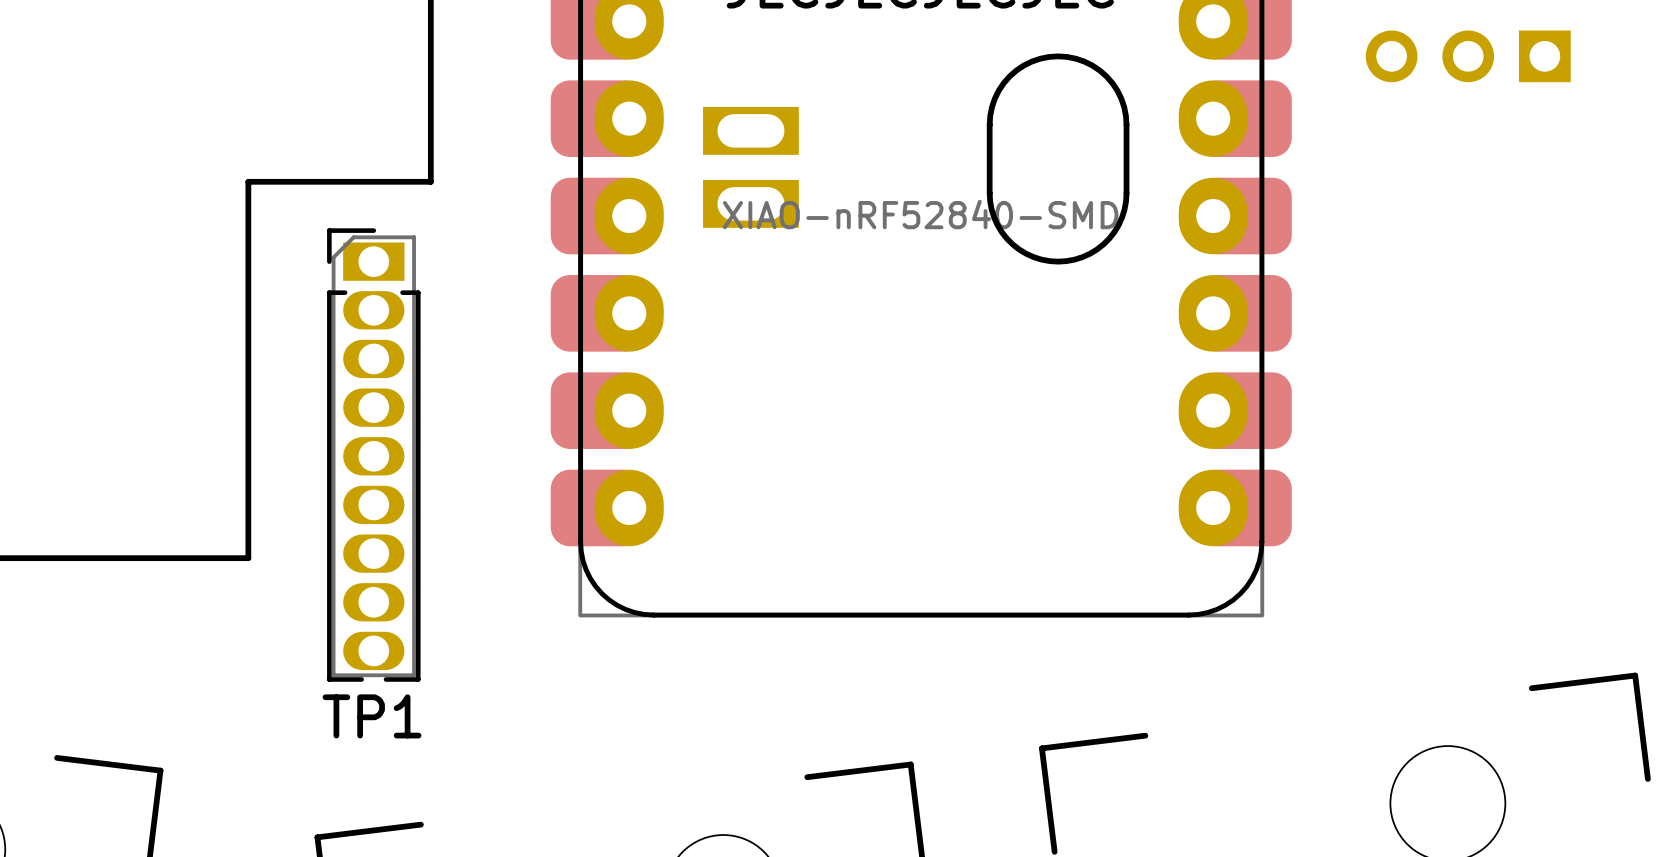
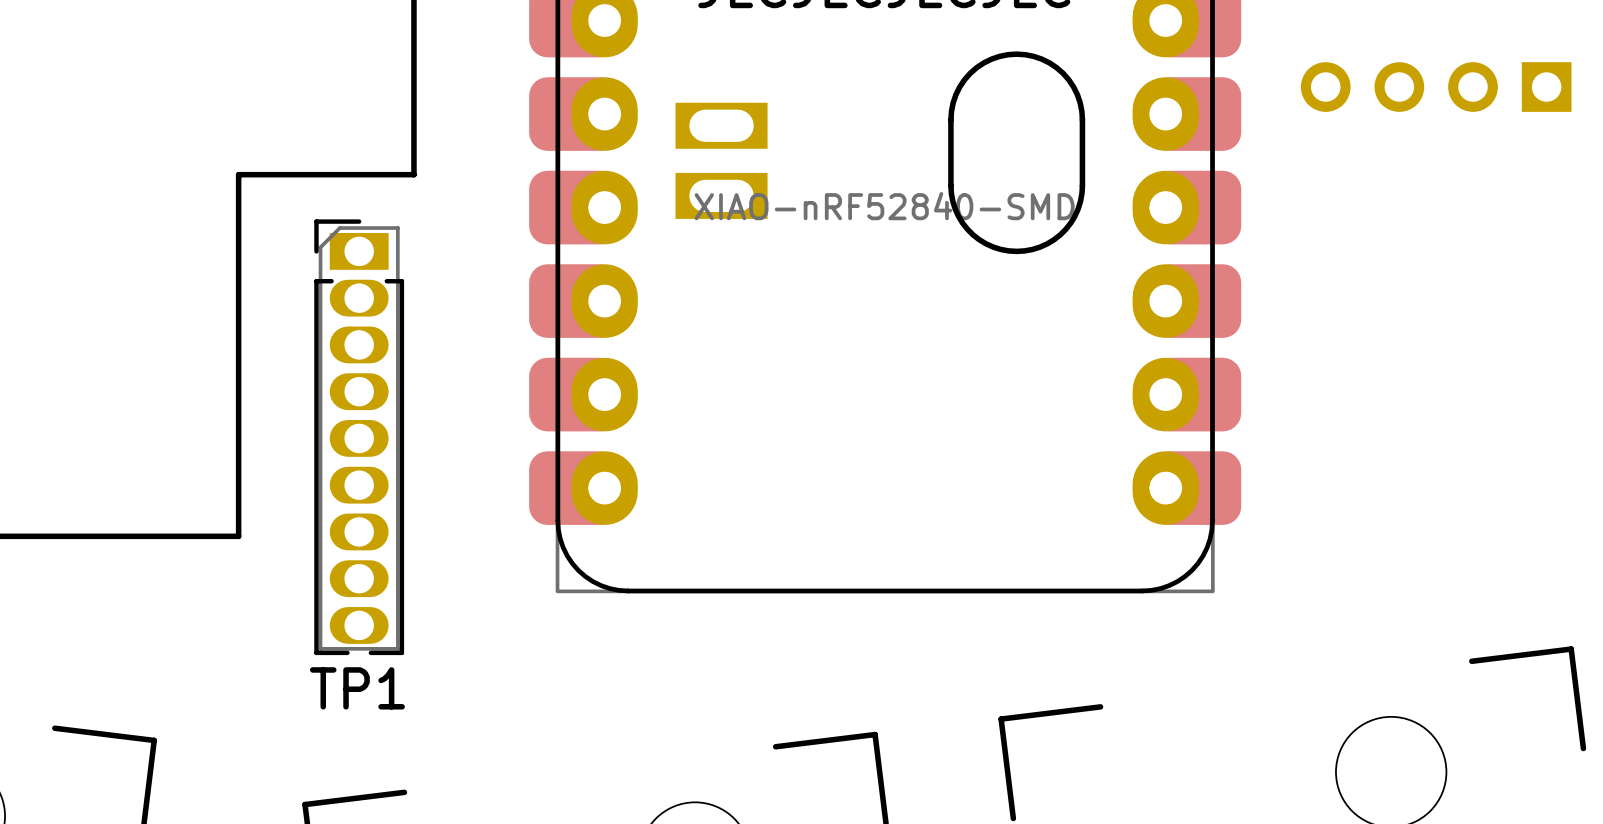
part: (1468, 56) -> none
part: none -> (1436, 87)

